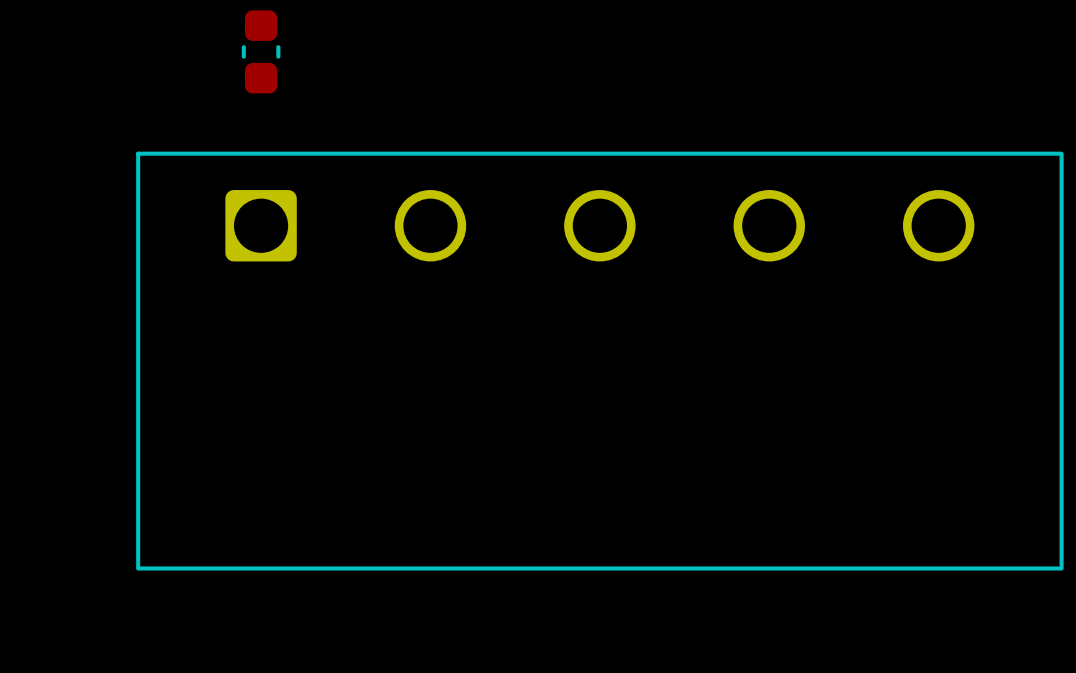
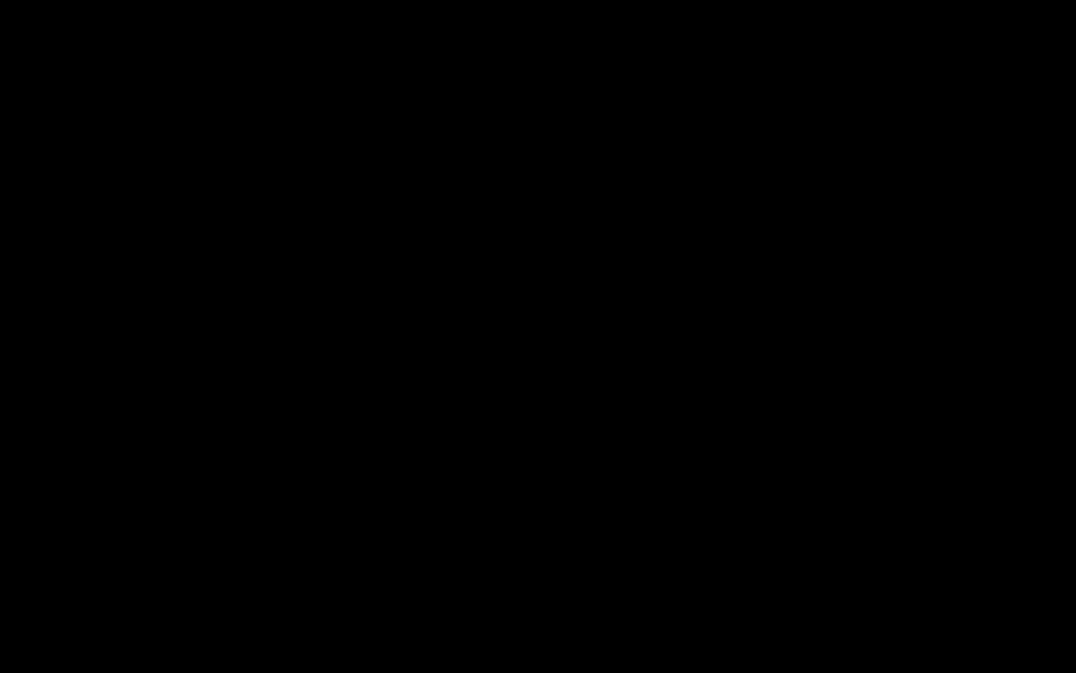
part: (261, 51) -> none
part: (599, 361) -> none

